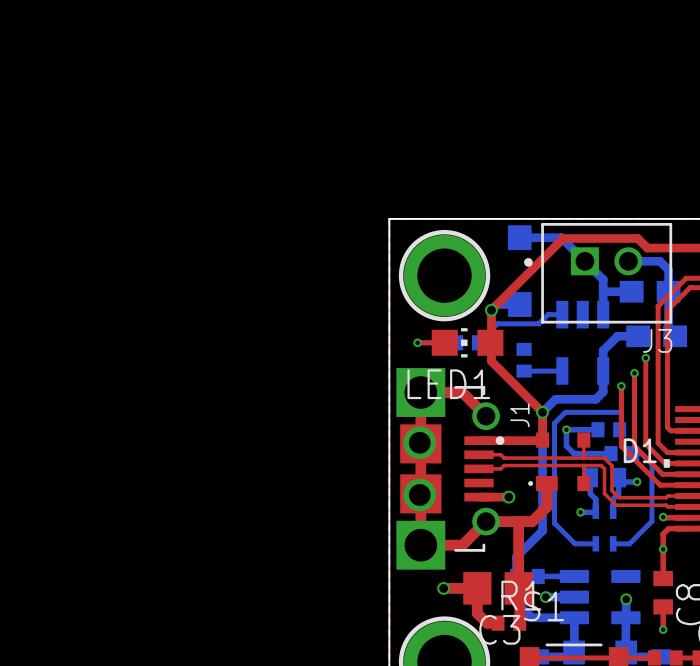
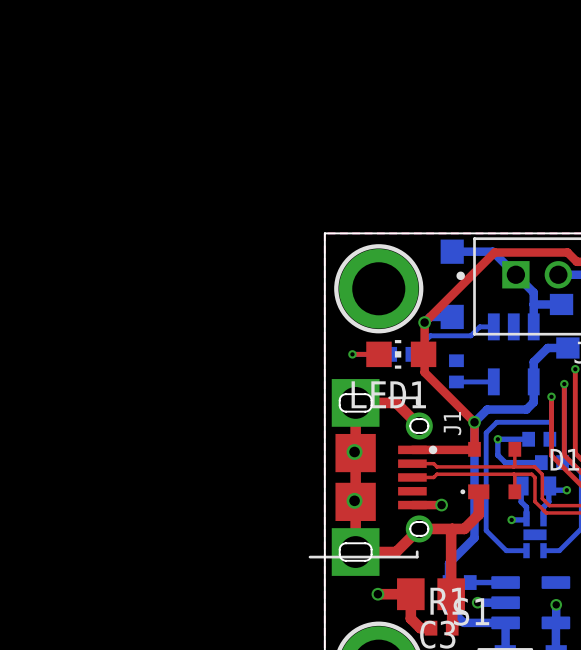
J1 footprint: [396, 368, 505, 570] -> [308, 379, 438, 576]
via size: [403, 426, 437, 460] -> [346, 444, 363, 460]
via size: [403, 478, 437, 512] -> [346, 492, 363, 509]
part footprint: [592, 503, 617, 552] -> [523, 511, 547, 559]

